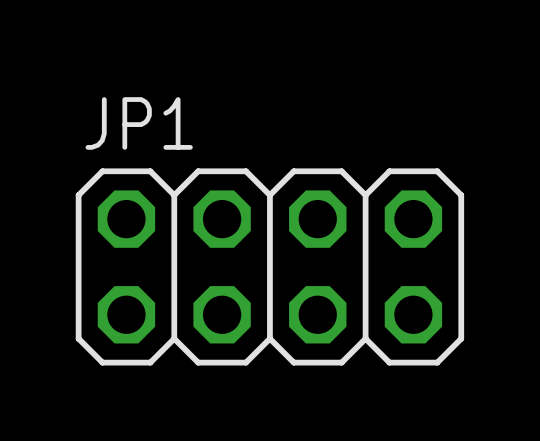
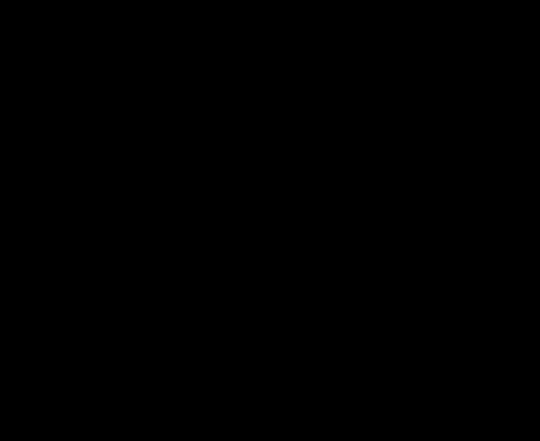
JP1: (269, 266) -> none

